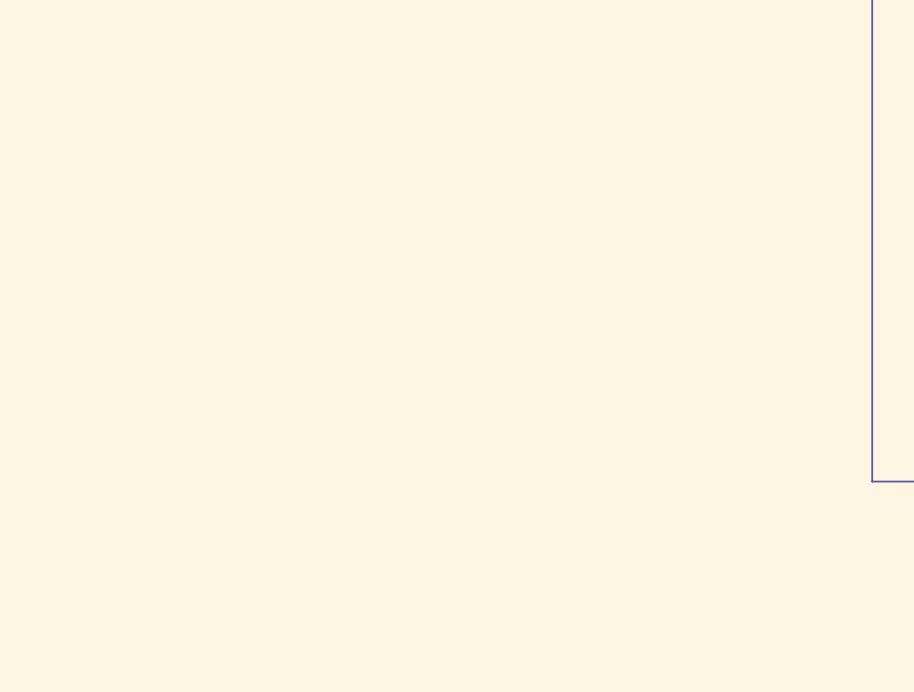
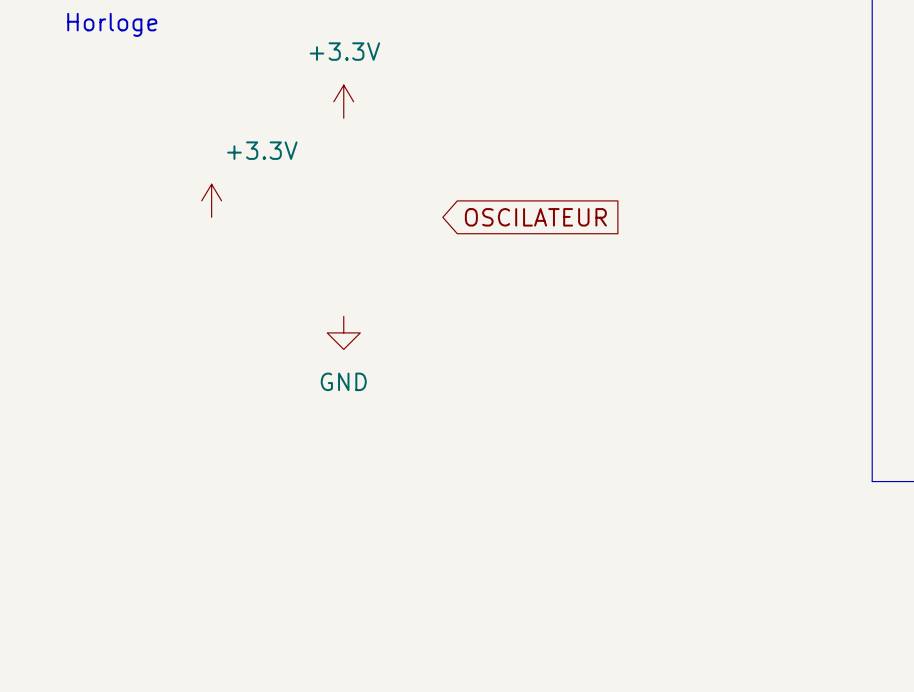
text: none -> Horloge (112, 24)
power symbol: none -> +3.3V (343, 101)
power symbol: none -> +3.3V (211, 200)
global label: none -> OSCILATEUR (535, 217)
power symbol: none -> GND (343, 332)

